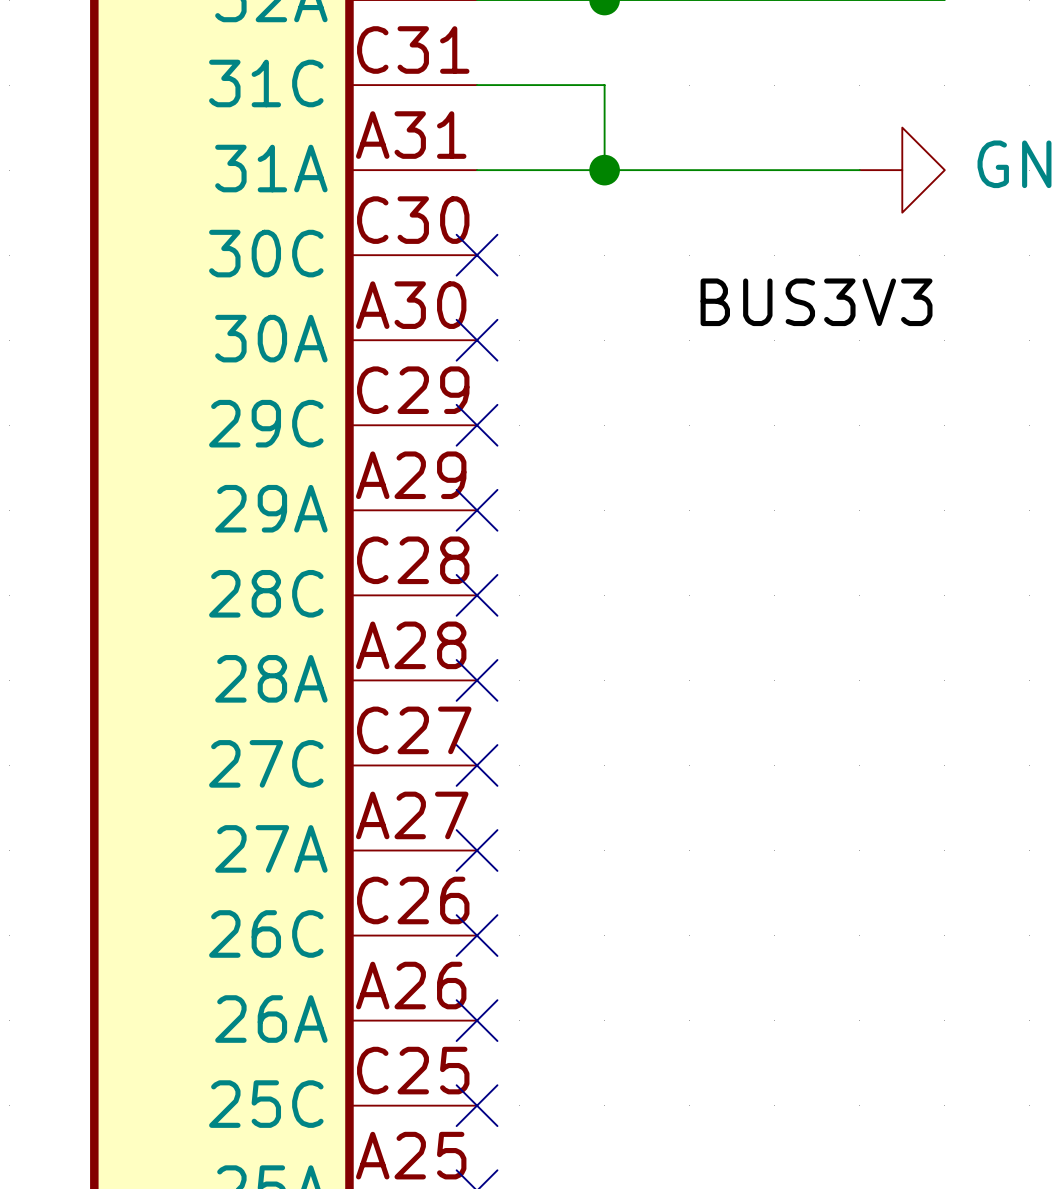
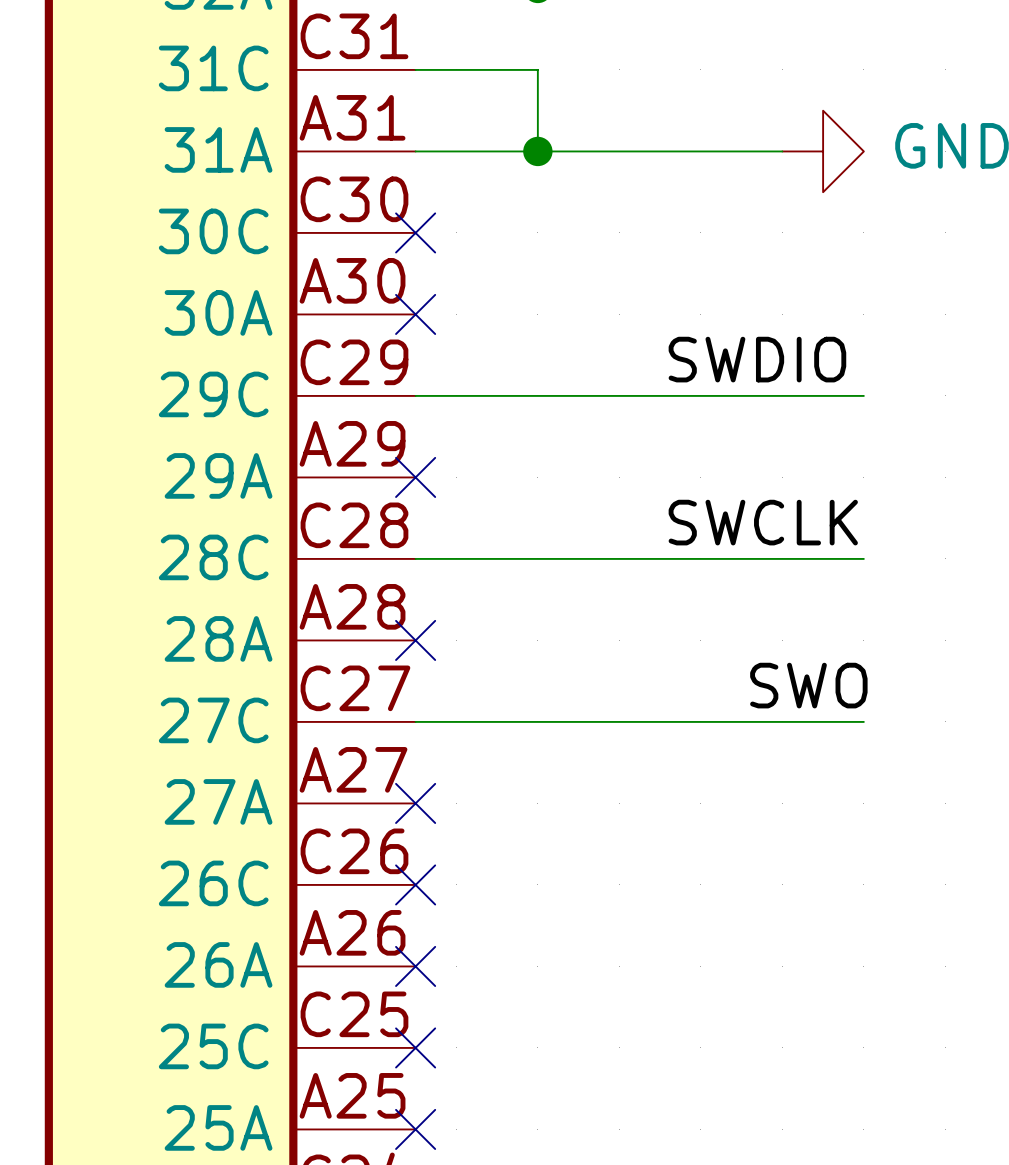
label: BUS3V3 (816, 302) -> none
label: none -> SWDIO (757, 359)
wire: none -> (415, 395) (863, 395)
no-connect mark: (477, 425) -> none
label: none -> SWCLK (763, 522)
wire: none -> (415, 558) (863, 558)
no-connect mark: (477, 595) -> none
label: none -> SWO (808, 685)
wire: none -> (415, 721) (863, 721)
no-connect mark: (477, 765) -> none

